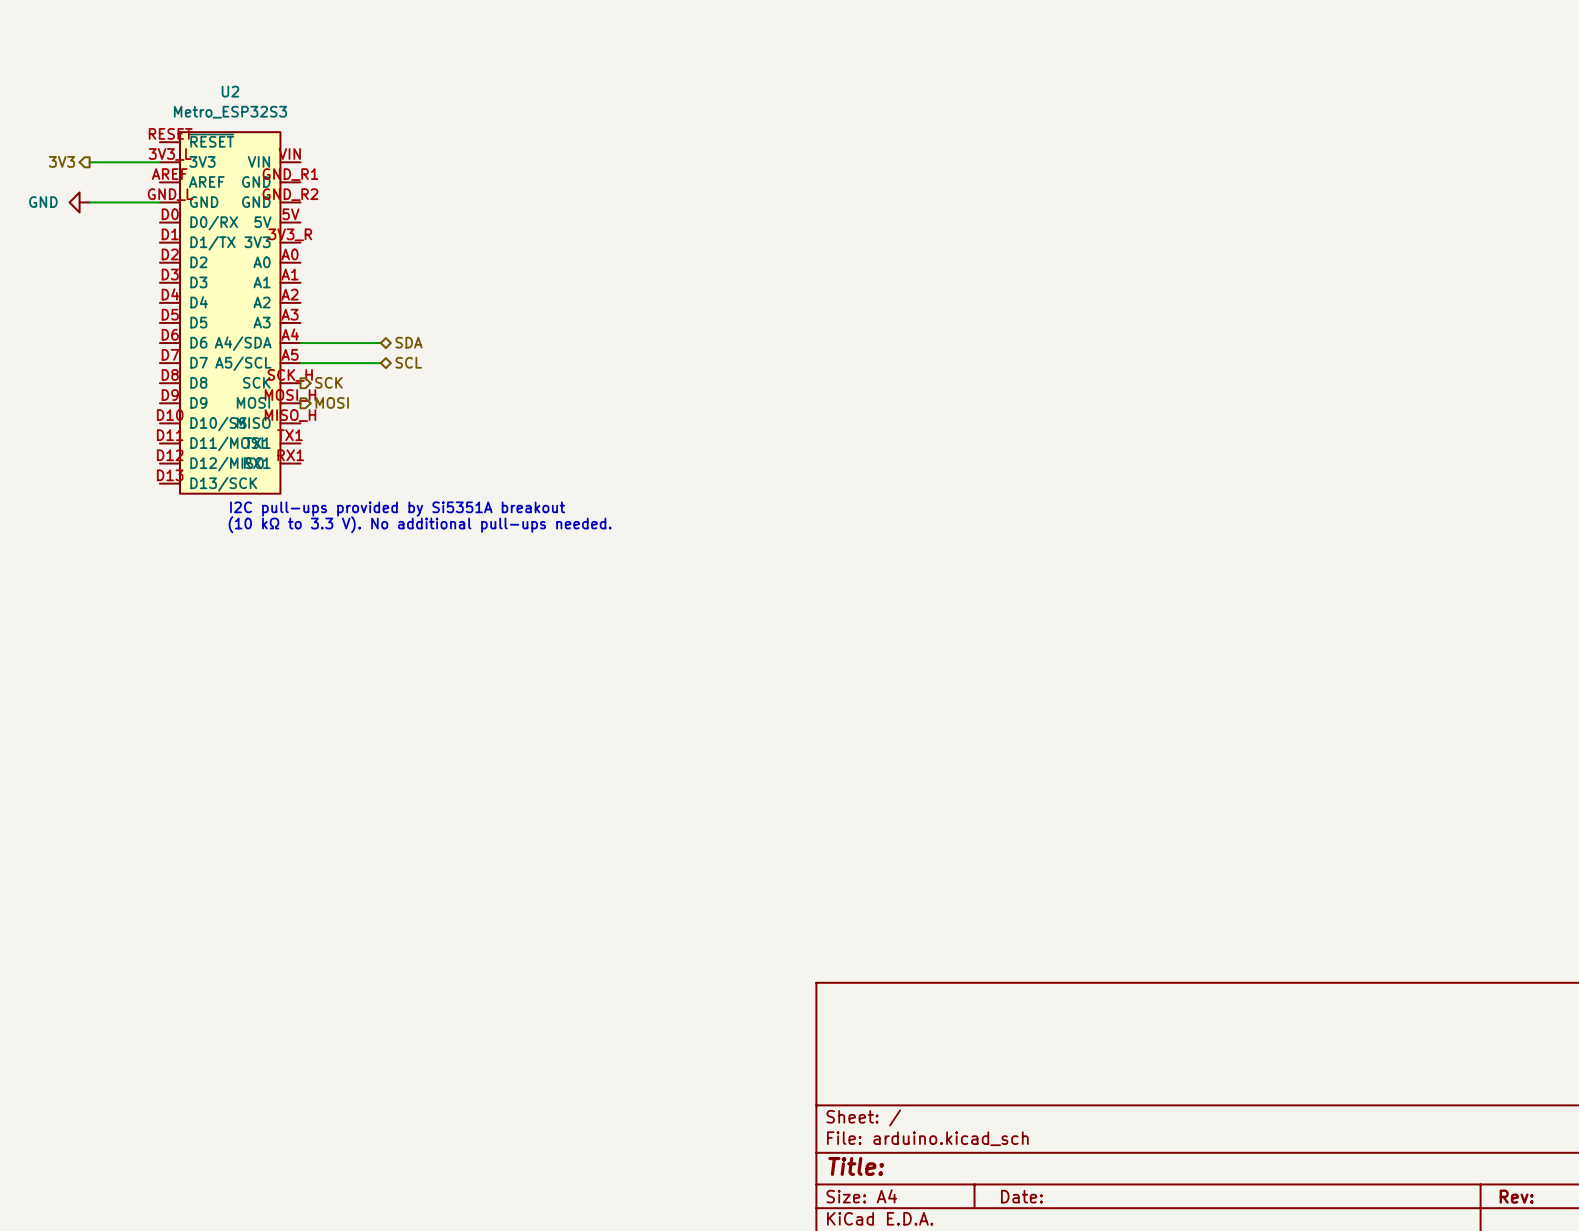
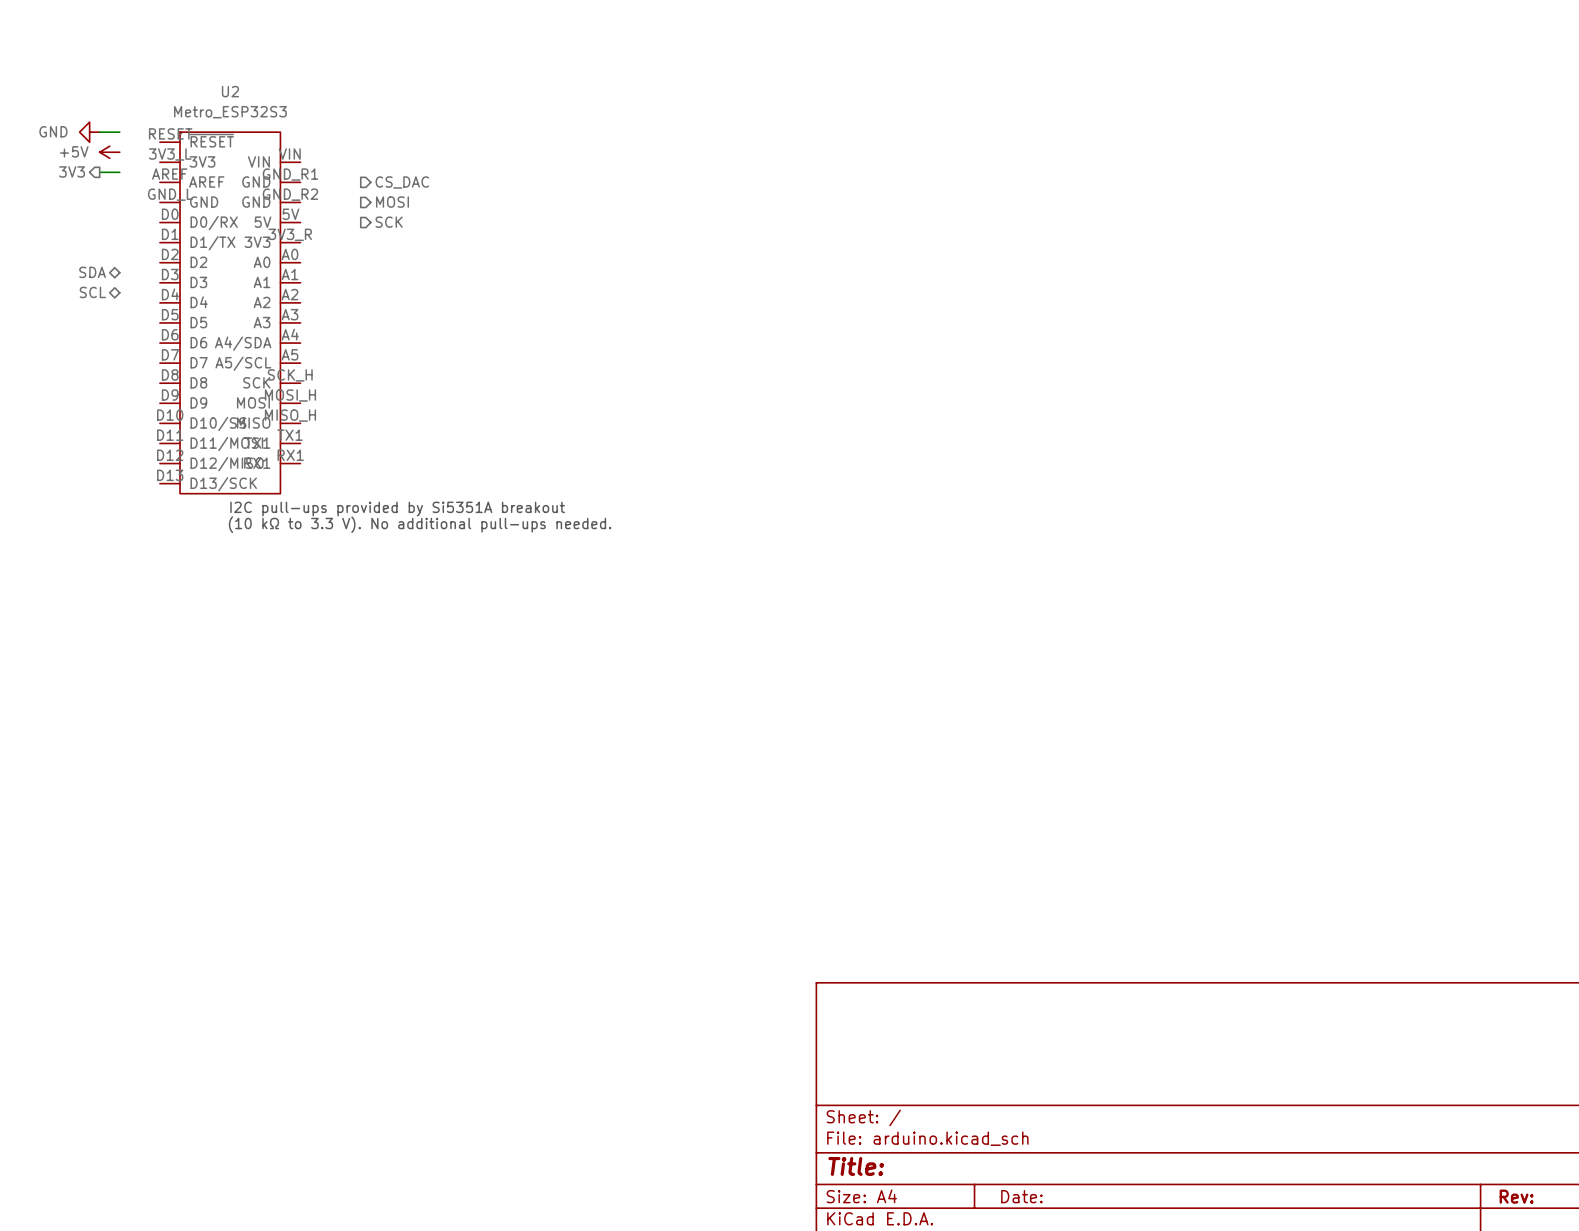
wire: none -> (99, 132) (119, 132)
power symbol: none -> +5V (109, 152)
hierarchical label position: 3V3 (61, 161) -> 3V3 (72, 171)
wire: (89, 162) (159, 162) -> none
wire: none -> (99, 172) (119, 172)
hierarchical label: none -> CS_DAC (402, 182)
power symbol position: GND (79, 202) -> GND (89, 132)
wire: (89, 202) (159, 202) -> none
hierarchical label: none -> MOSI (392, 202)
hierarchical label: none -> SDA (92, 272)
hierarchical label: none -> SCL (92, 292)
hierarchical label: SDA (408, 342) -> none
wire: (300, 343) (380, 343) -> none
hierarchical label: SCL (408, 362) -> none
wire: (300, 363) (380, 363) -> none
hierarchical label position: SCK (328, 382) -> SCK (389, 222)
hierarchical label: MOSI (332, 402) -> none

